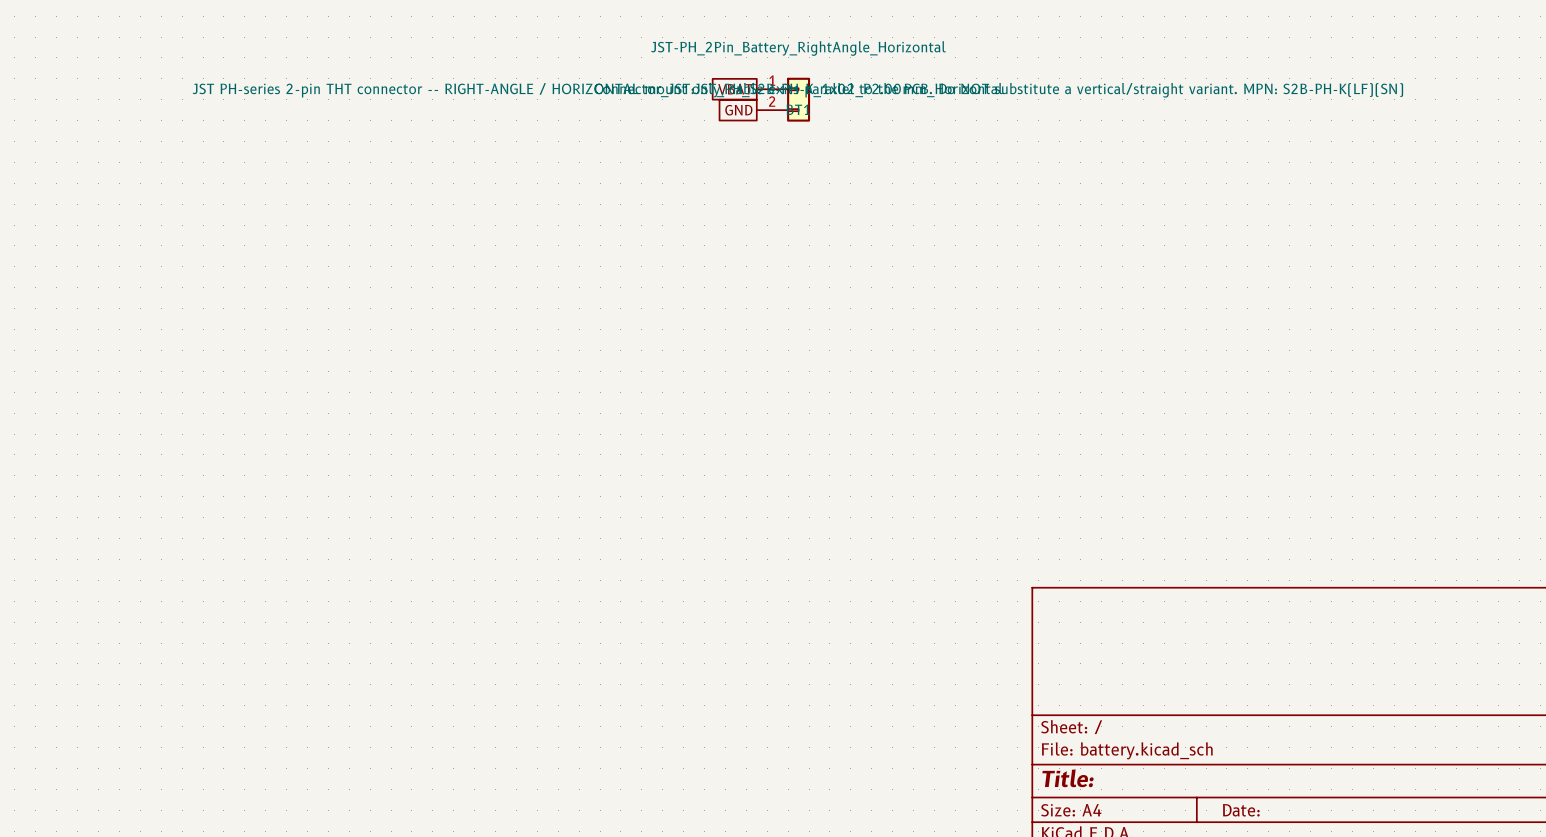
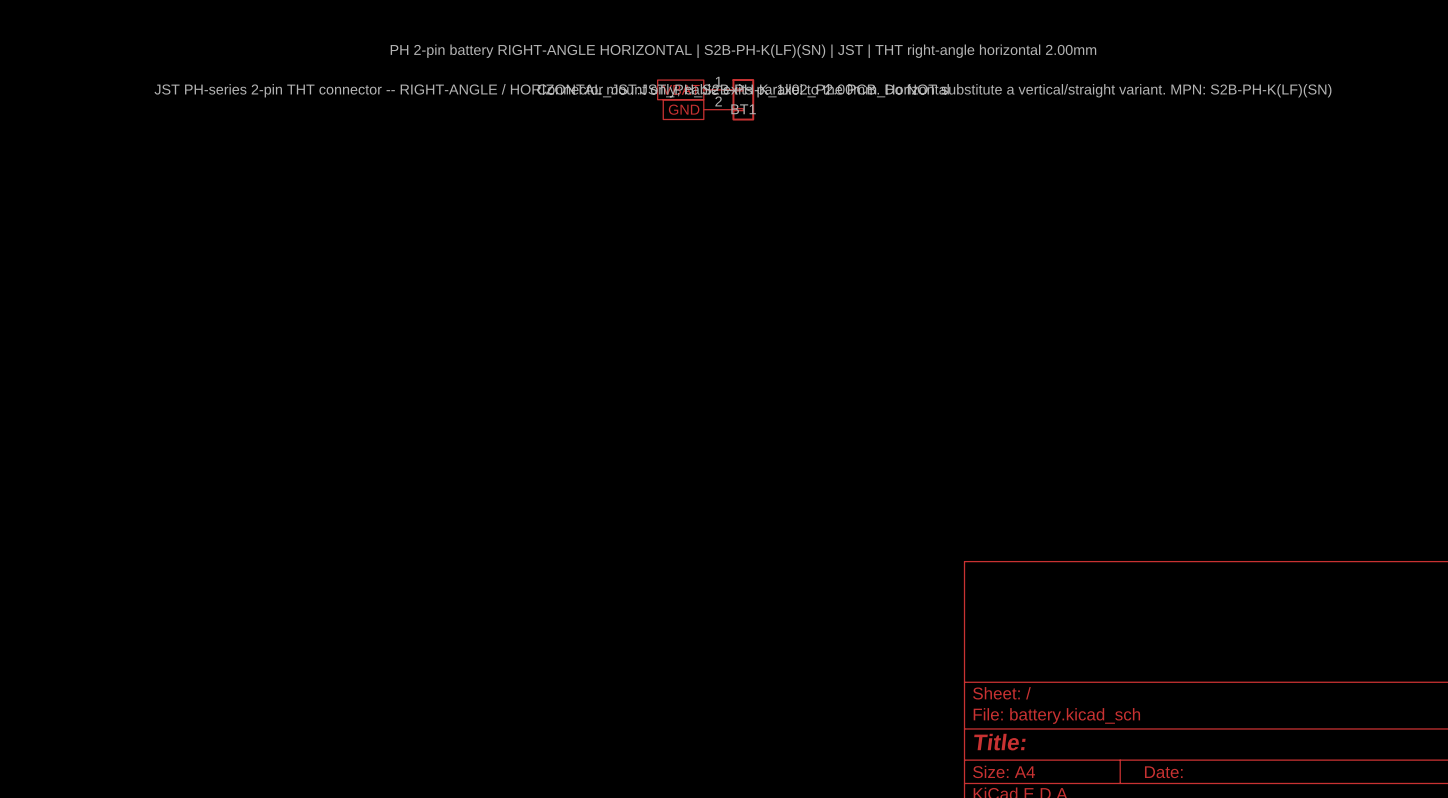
BT1 value: JST-PH_2Pin_Battery_RightAngle_Horizontal (798, 48) -> PH 2-pin battery RIGHT-ANGLE HORIZONTAL | S2B-PH-K(LF)(SN) | JST | THT right-angle horizontal 2.00mm (743, 51)

